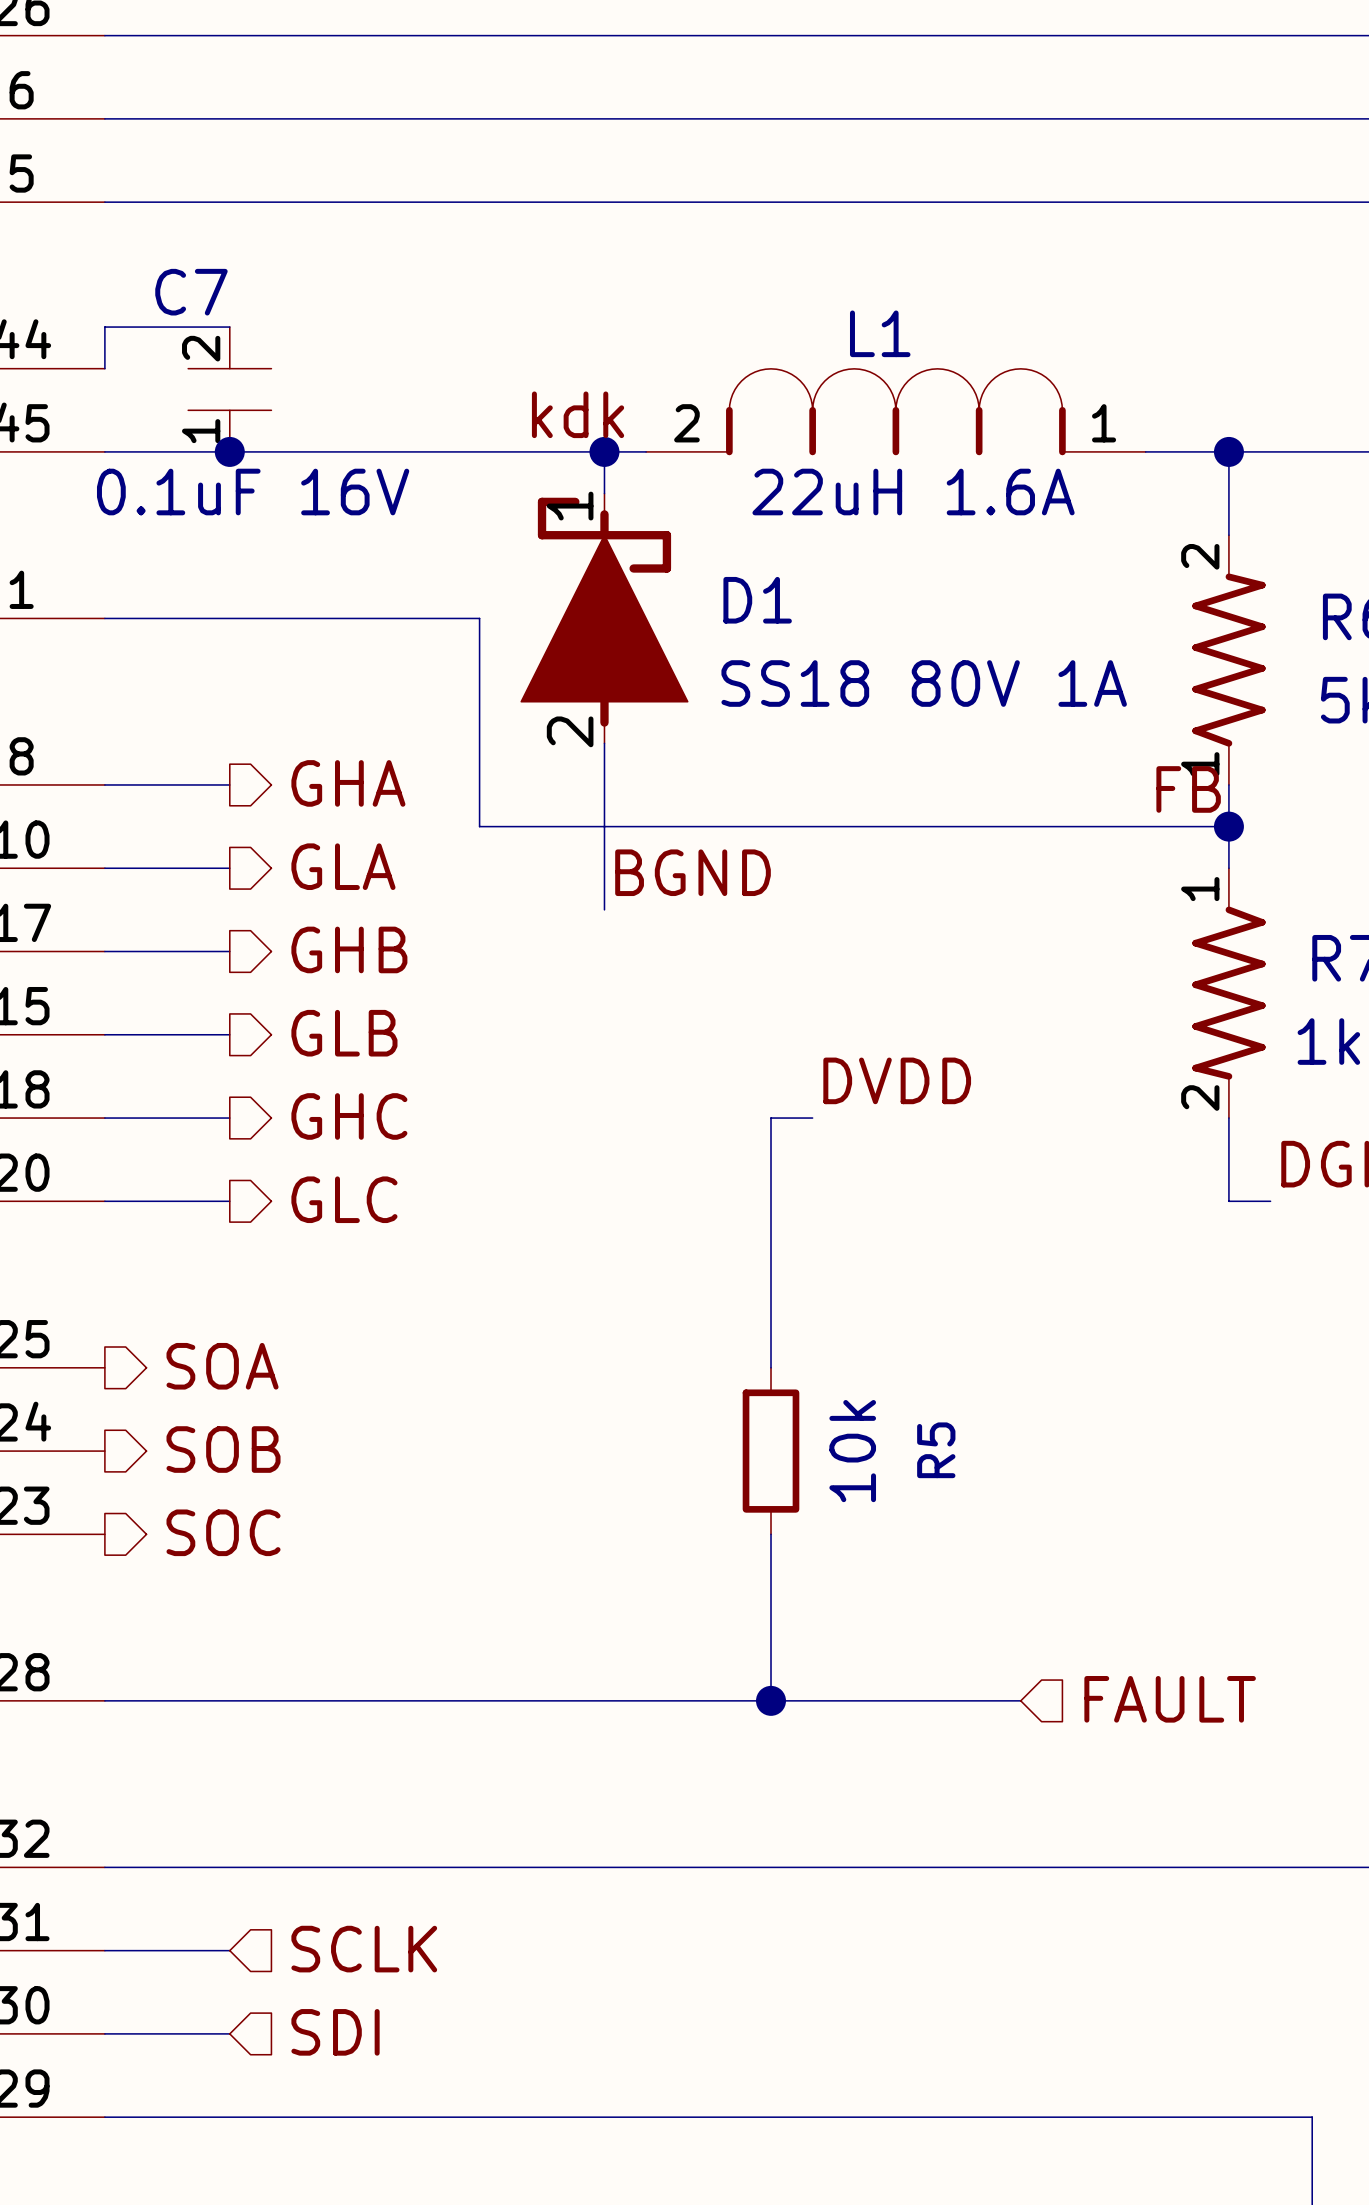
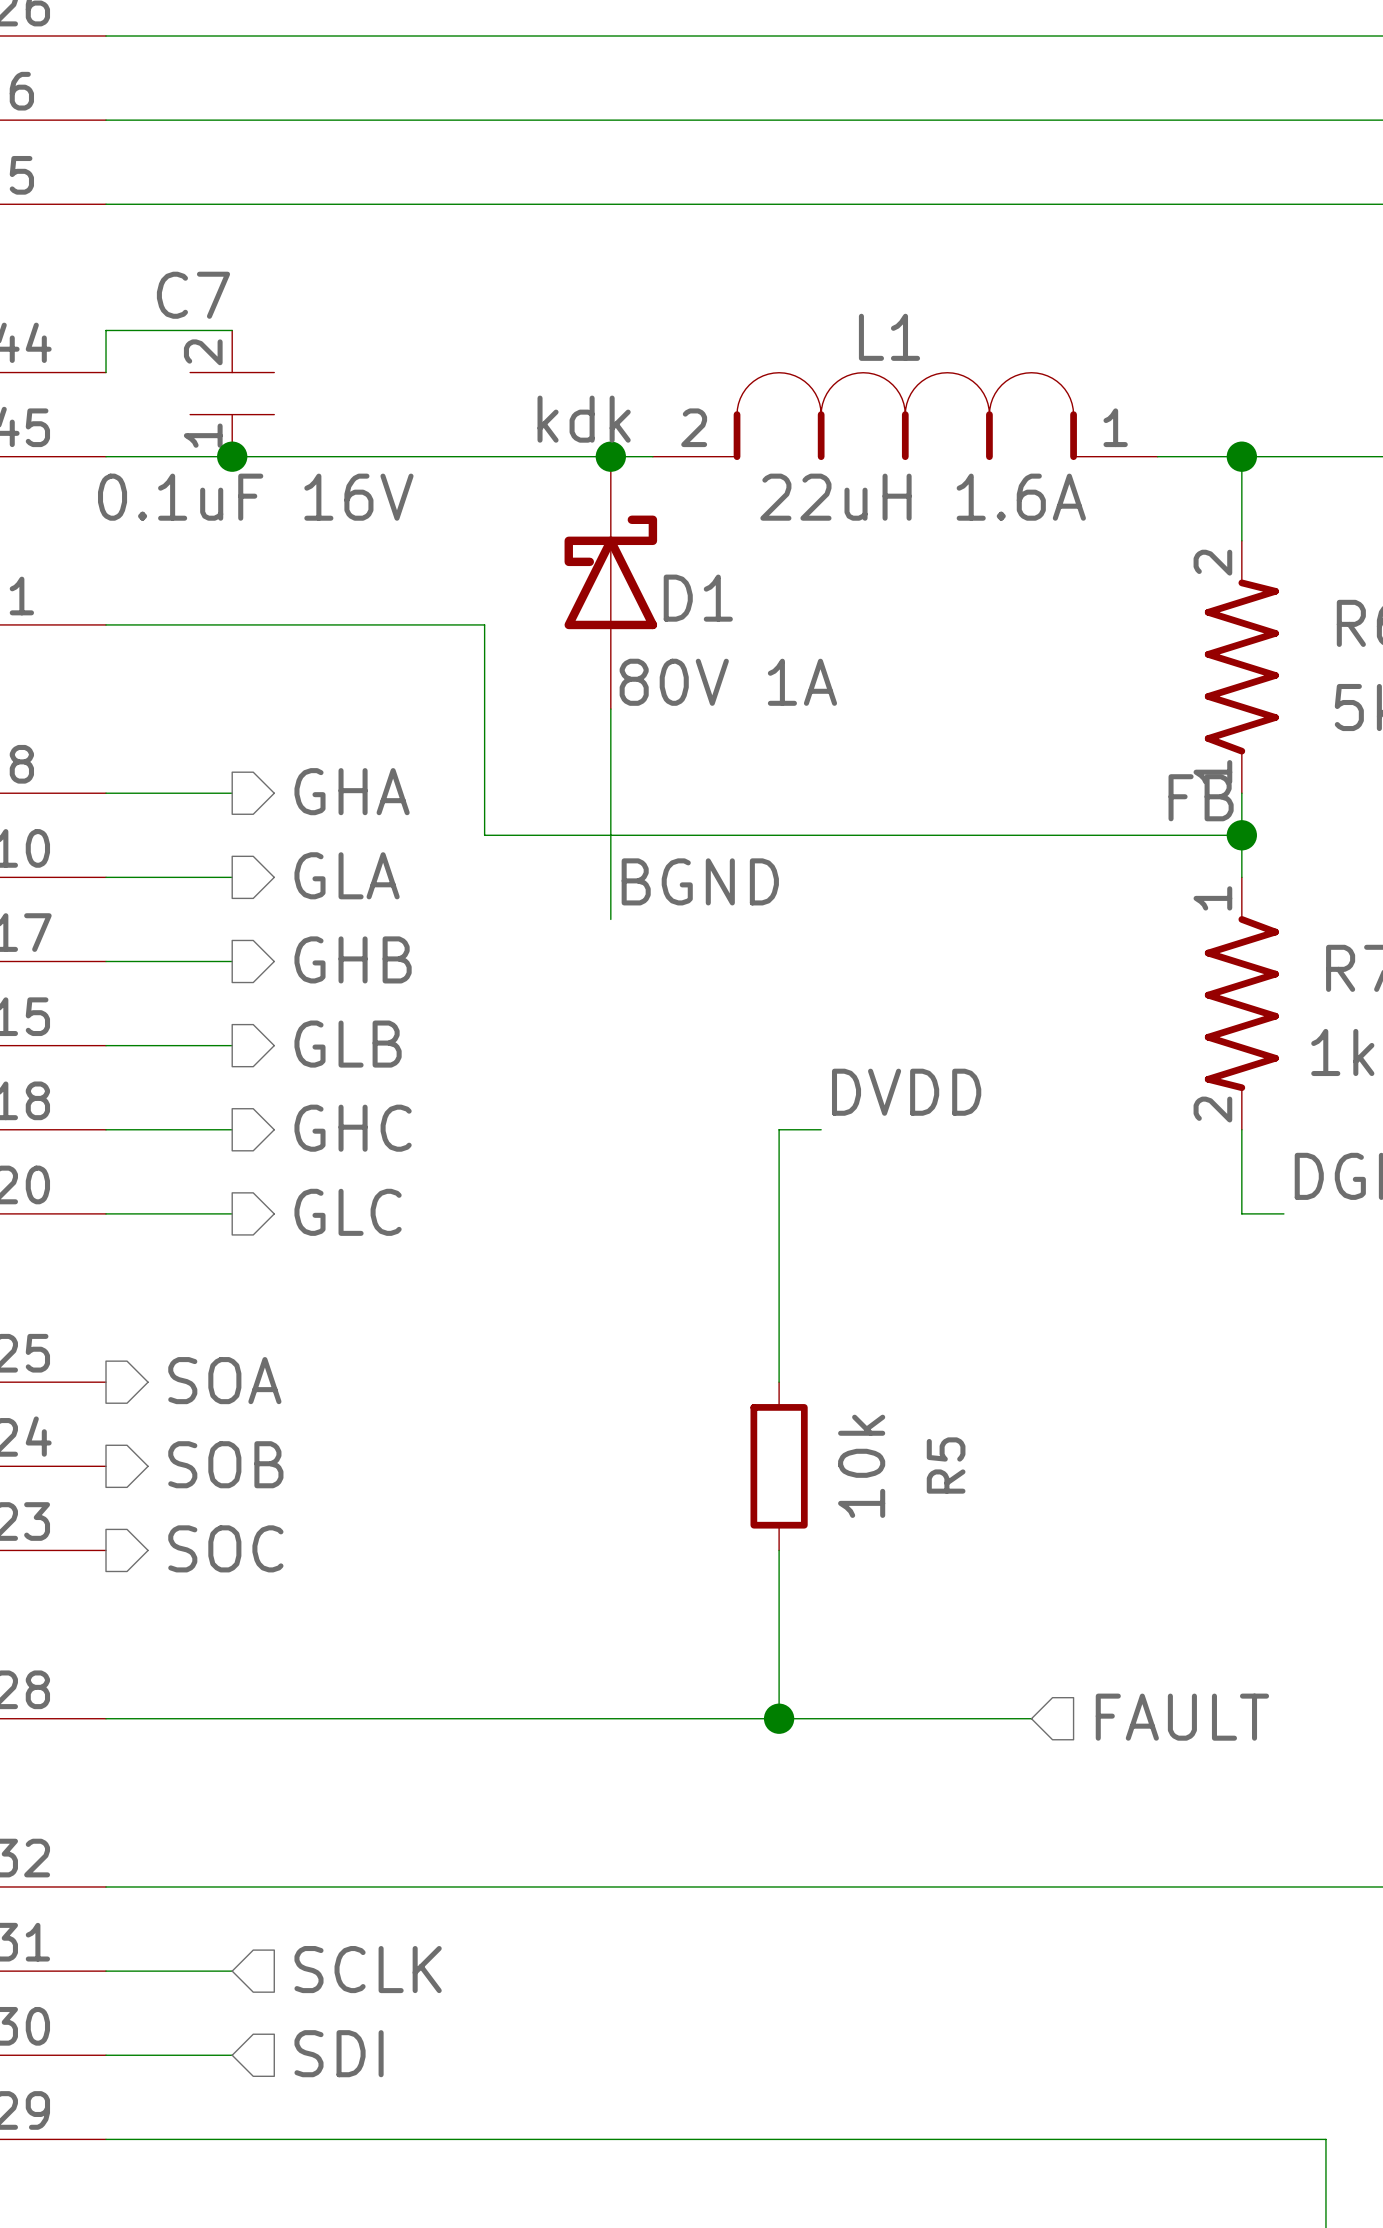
D1 symbol: [520, 493, 689, 744] -> [564, 456, 658, 710]
D1 name position: D1 (757, 600) -> D1 (698, 598)
D1 value: SS18 80V 1A (924, 683) -> 80V 1A (728, 682)

